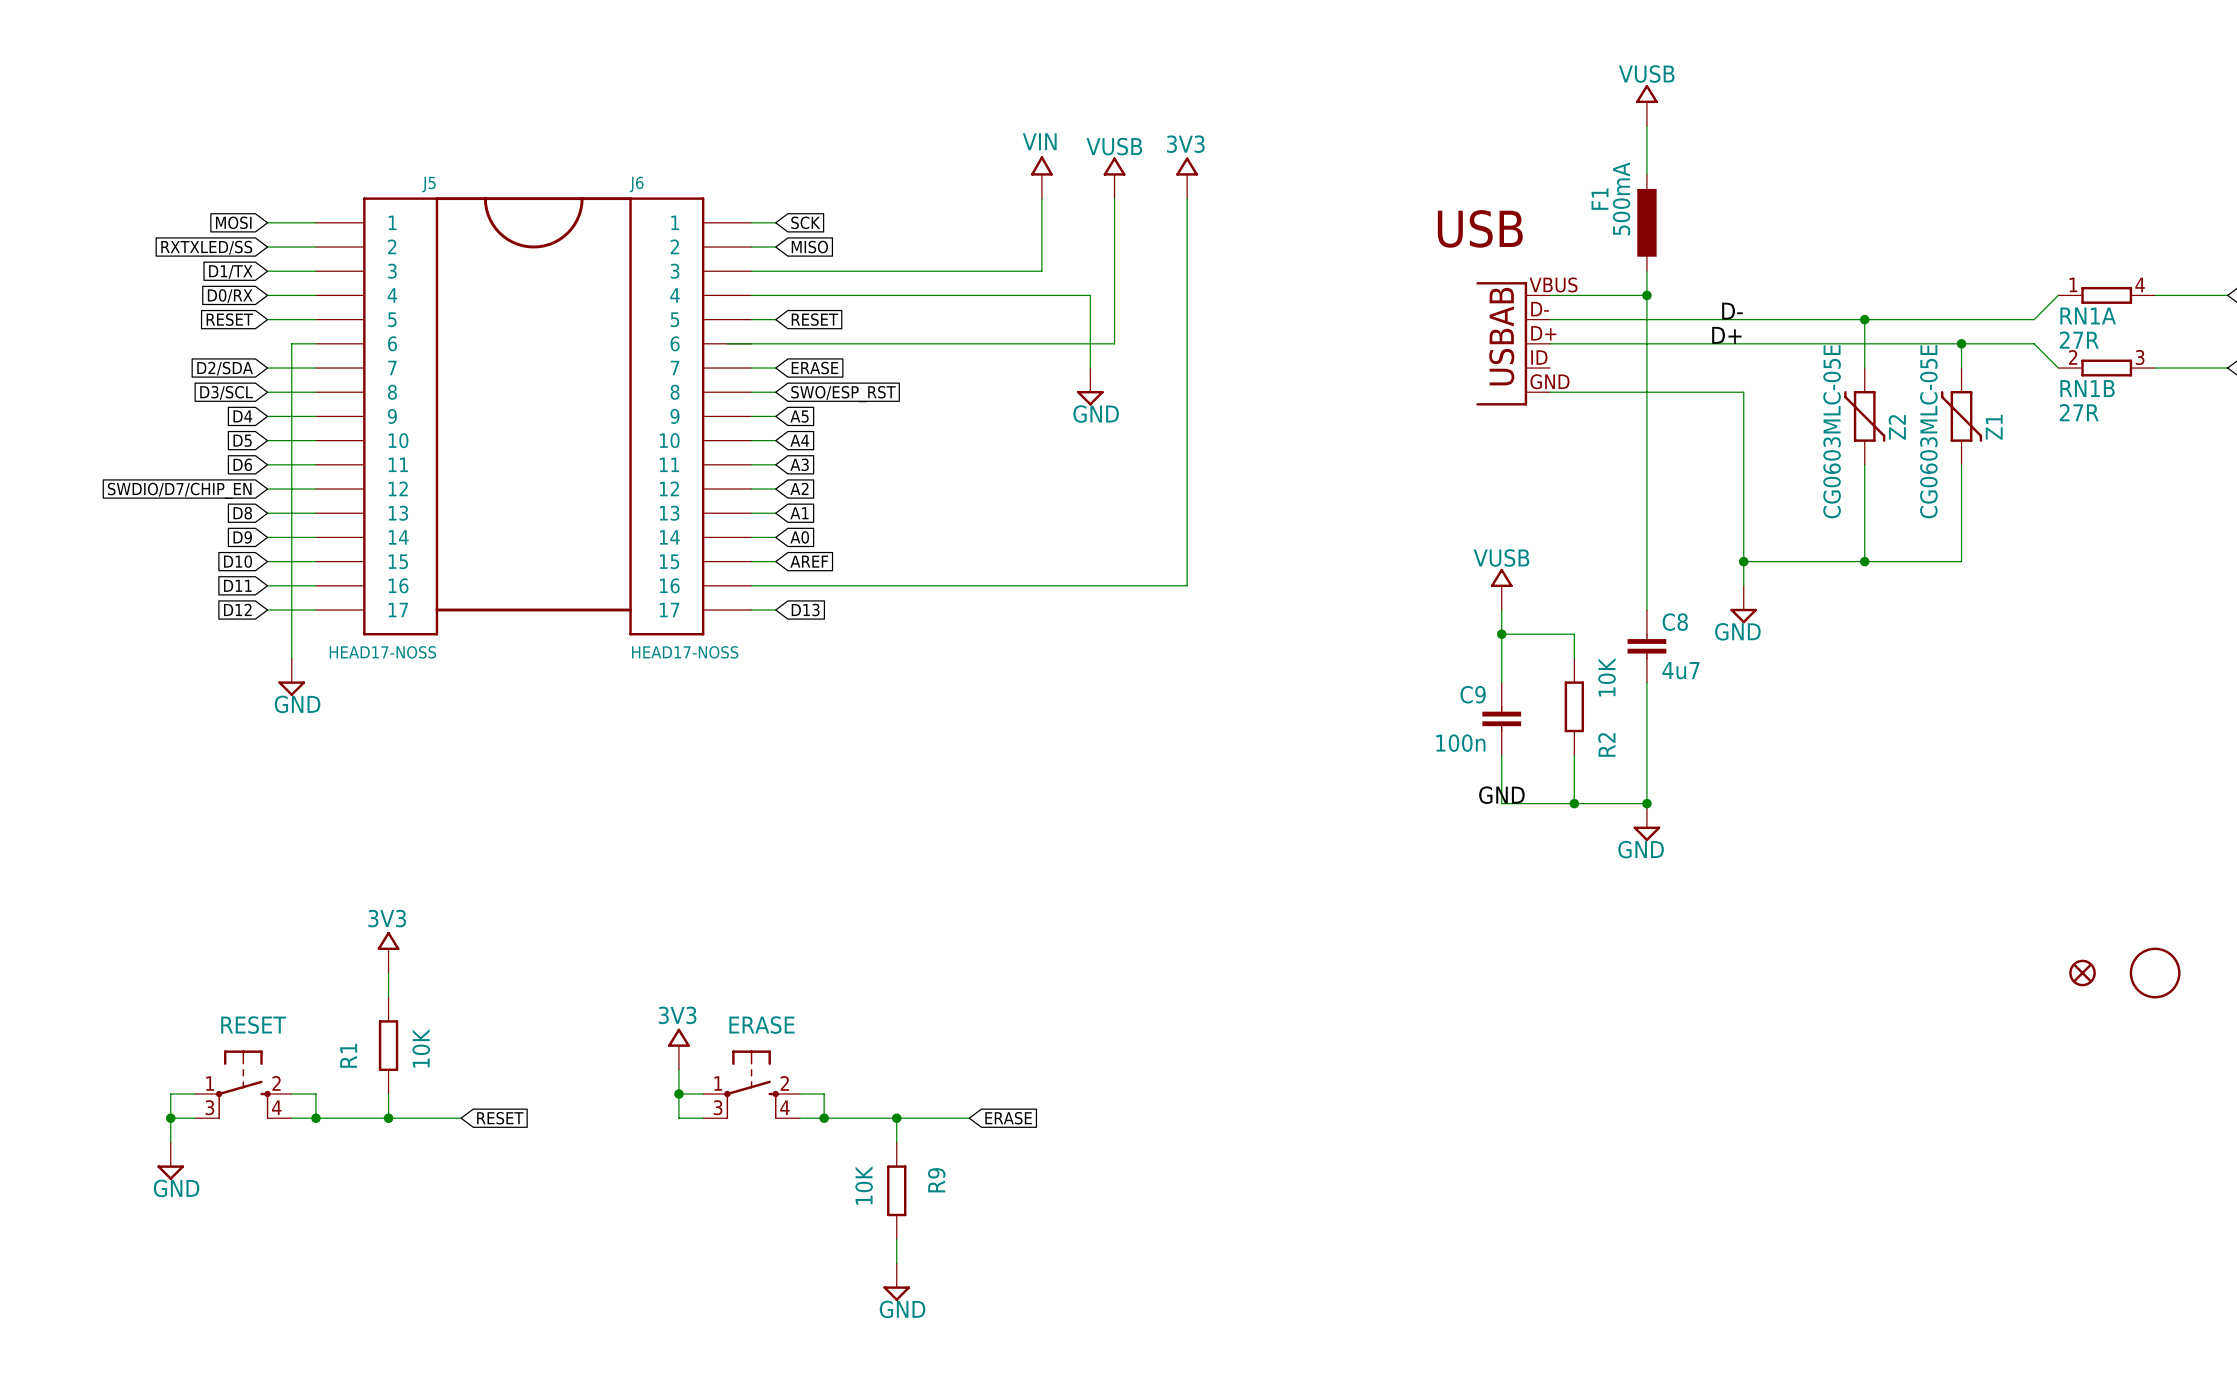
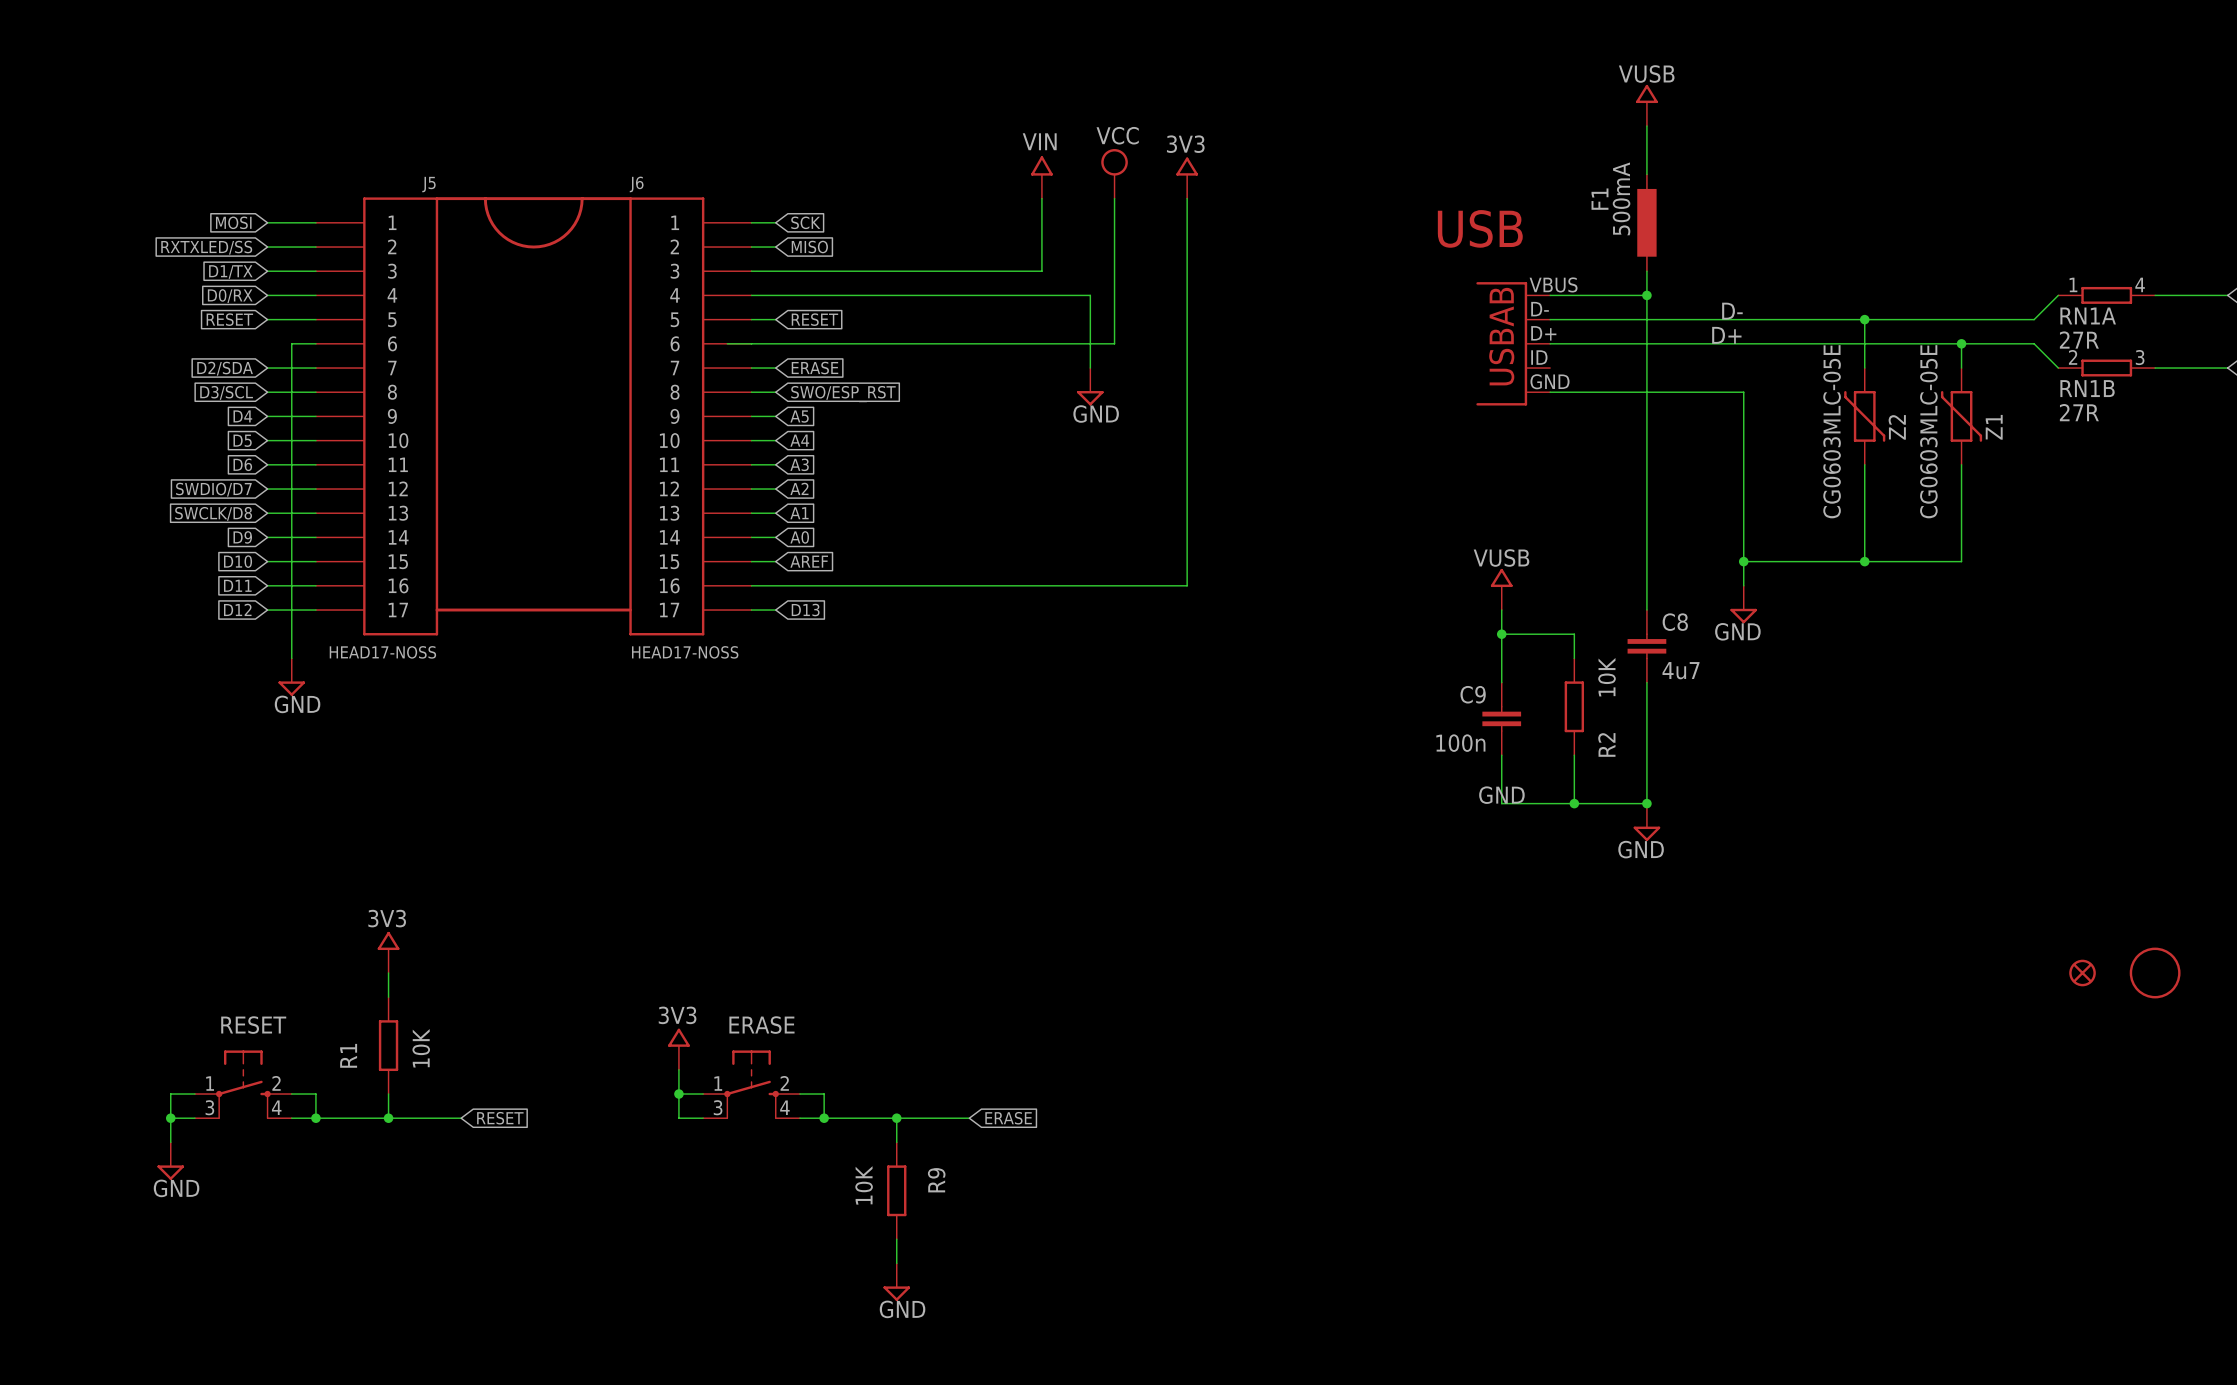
power symbol: VUSB (1114, 178) -> VCC (1114, 173)
global label: SWDIO/D7/CHIP_EN (179, 490) -> SWDIO/D7 (213, 489)
global label: D8 (242, 513) -> SWCLK/D8 (213, 513)

